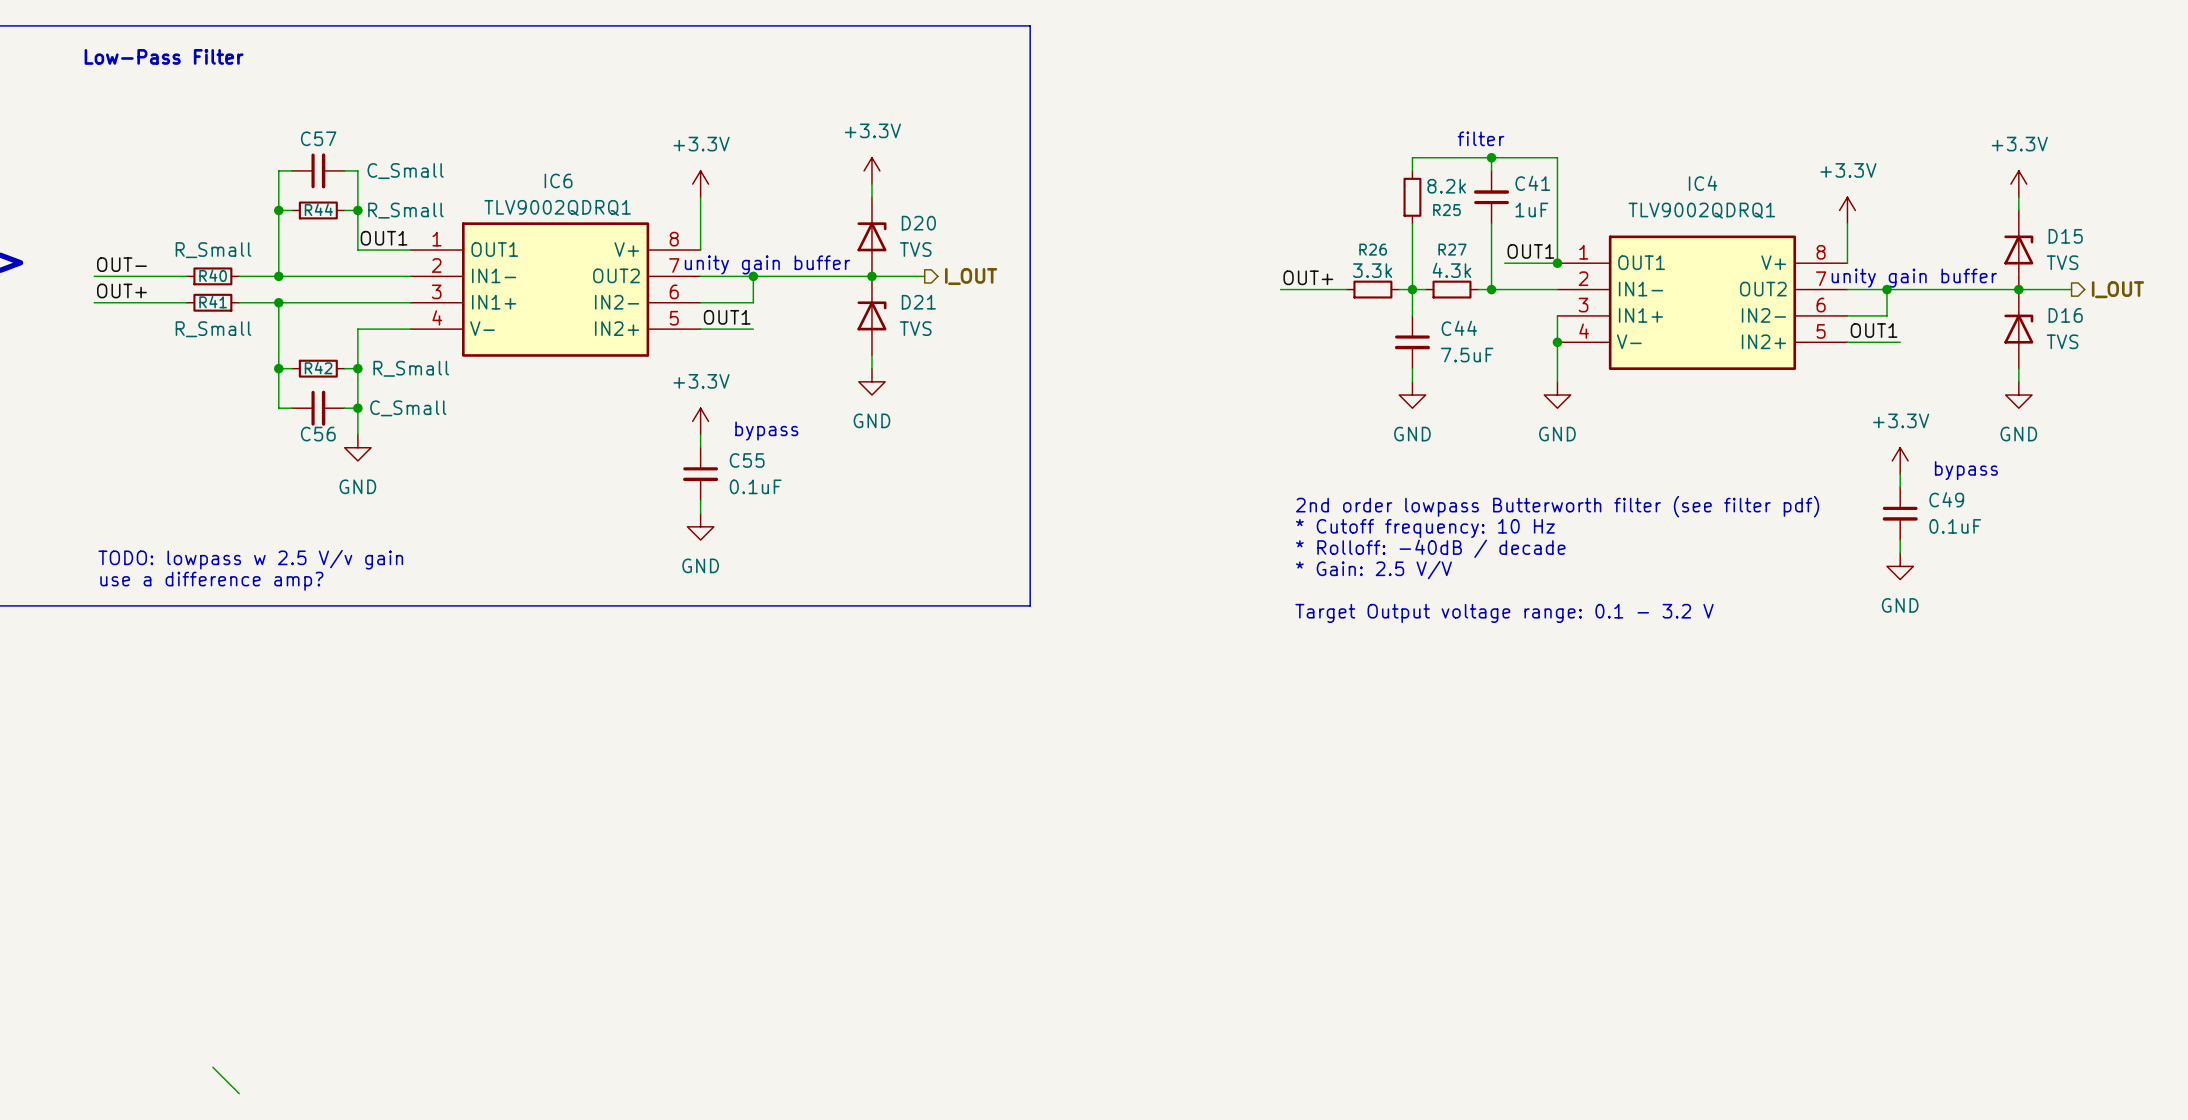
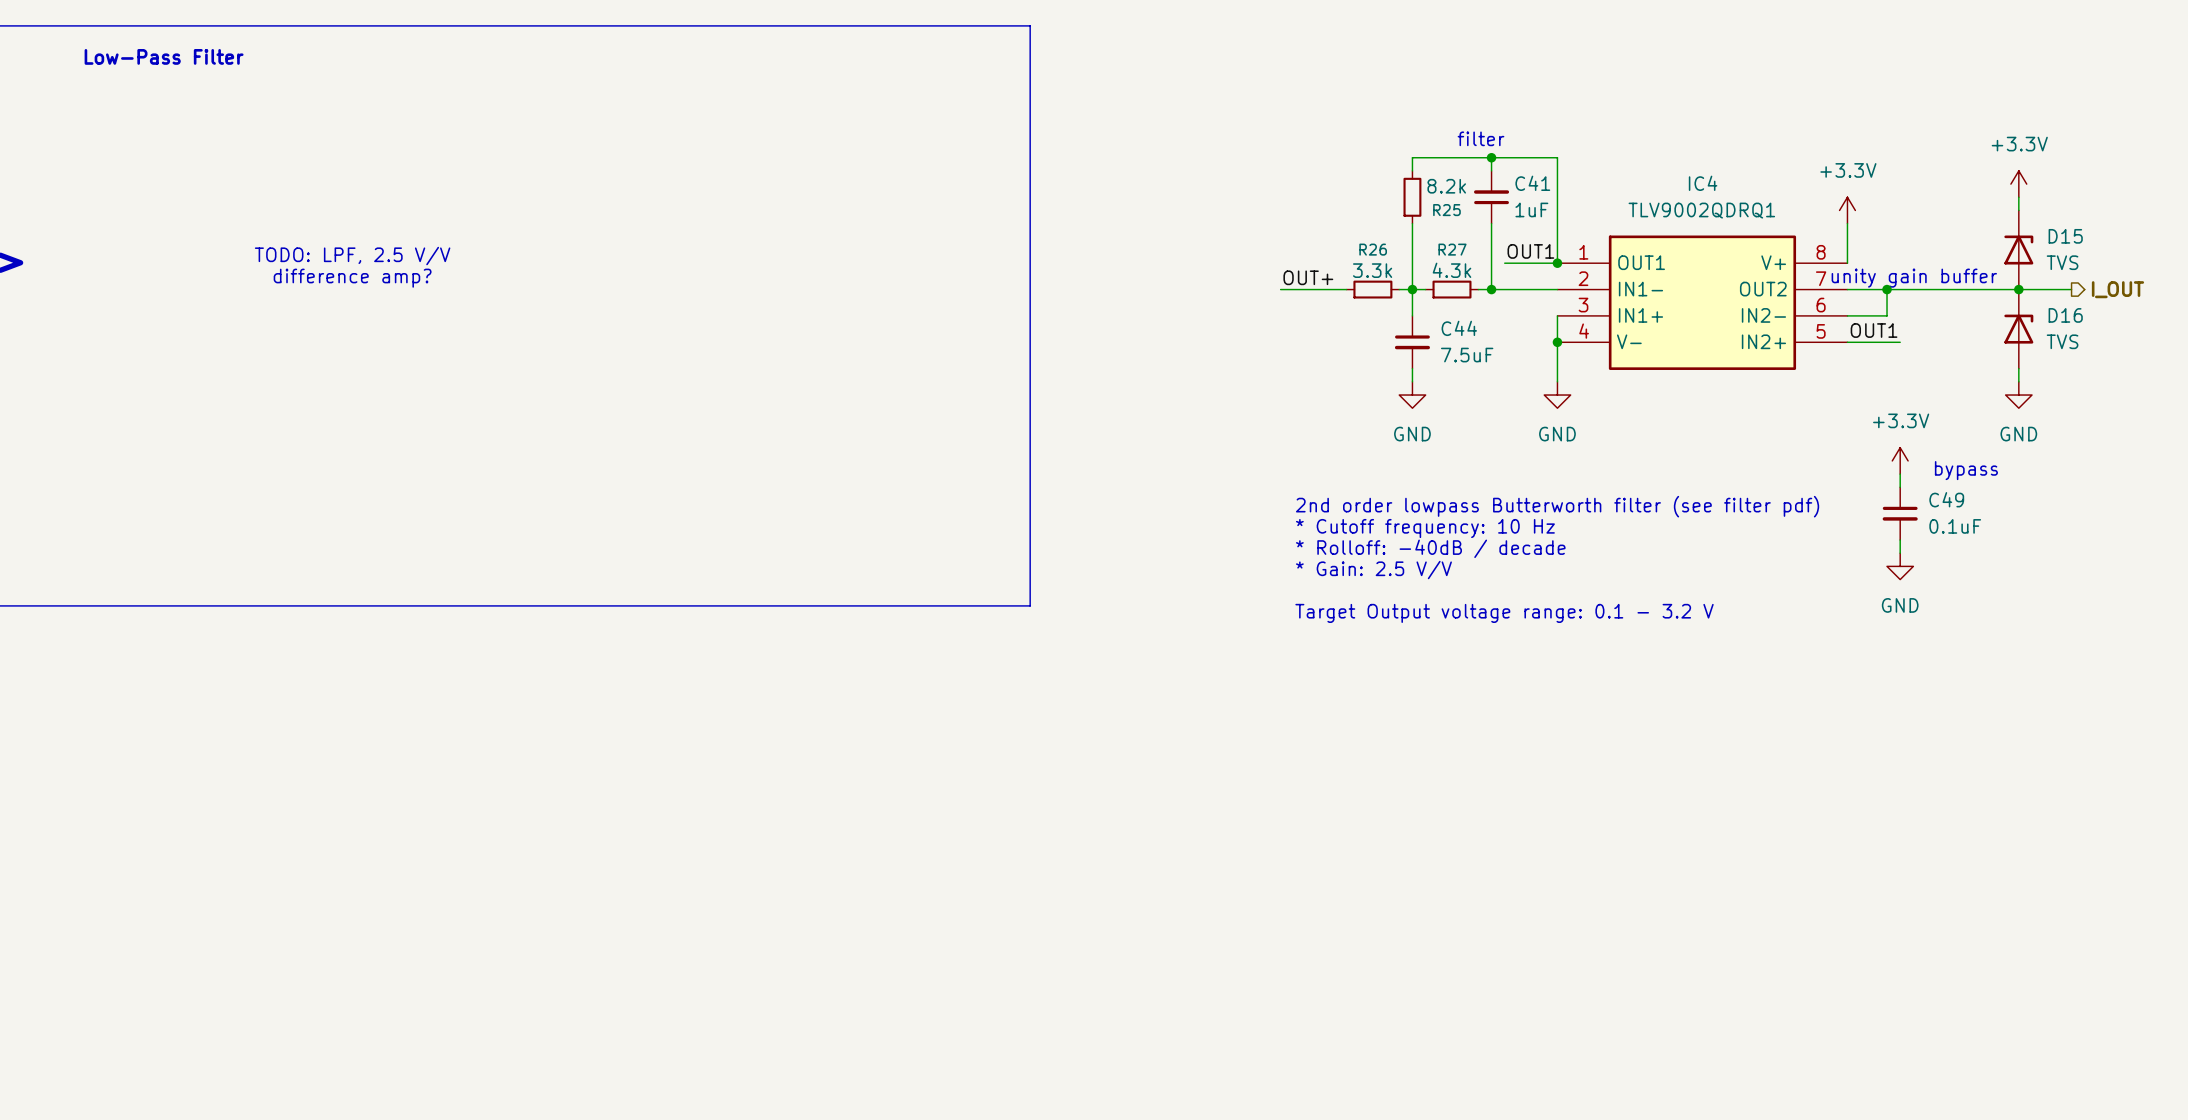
wire: (291, 170) (278, 170) (278, 276) -> none
C57: C_Small (318, 170) -> none
wire: (344, 170) (357, 170) (357, 250) (410, 250) -> none
power symbol: +3.3V (871, 170) -> none
power symbol: +3.3V (700, 184) -> none
wire: (871, 184) (871, 197) -> none
wire: (700, 197) (700, 250) -> none
wire: (278, 210) (291, 210) -> none
junction: (278, 210) -> none
R44: R_Small (318, 210) -> none
wire: (344, 210) (357, 210) -> none
junction: (357, 210) -> none
D20: TVS (871, 236) -> none
label: OUT1 (384, 238) -> none
text: none -> TODO: LPF, 2.5 V/V (352, 256)
label: OUT- (121, 264) -> none
text: unity gain buffer (767, 264) -> none
wire: (94, 276) (186, 276) -> none
R40: R_Small (212, 276) -> none
wire: (239, 276) (410, 276) -> none
junction: (278, 276) -> none
wire: (700, 276) (924, 276) -> none
wire: (753, 276) (753, 302) (700, 302) -> none
junction: (753, 276) -> none
junction: (871, 276) -> none
hierarchical label: I_OUT (971, 276) -> none
text: none -> difference amp? (352, 278)
IC6: TLV9002QDRQ1 (555, 289) -> none
label: OUT+ (121, 290) -> none
wire: (94, 302) (186, 302) -> none
R41: R_Small (212, 302) -> none
wire: (239, 302) (410, 302) -> none
wire: (278, 302) (278, 408) (291, 408) -> none
junction: (278, 302) -> none
D21: TVS (871, 315) -> none
label: OUT1 (727, 317) -> none
wire: (410, 329) (357, 329) (357, 434) -> none
wire: (700, 329) (753, 329) -> none
wire: (871, 355) (871, 368) -> none
wire: (278, 368) (291, 368) -> none
junction: (278, 368) -> none
R42: R_Small (318, 368) -> none
wire: (344, 368) (357, 368) -> none
junction: (357, 368) -> none
power symbol: GND (871, 381) -> none
C56: C_Small (318, 408) -> none
wire: (344, 408) (357, 408) -> none
junction: (357, 408) -> none
power symbol: +3.3V (700, 421) -> none
text: bypass (766, 431) -> none
wire: (700, 434) (700, 447) -> none
power symbol: GND (357, 447) -> none
C55: 0.1uF (700, 474) -> none
wire: (700, 500) (700, 513) -> none
power symbol: GND (700, 526) -> none
text: TODO: lowpass w 2.5 V/v gain (250, 559) -> none
text: use a difference amp? (211, 581) -> none
wire: (212, 1067) (239, 1093) -> none

